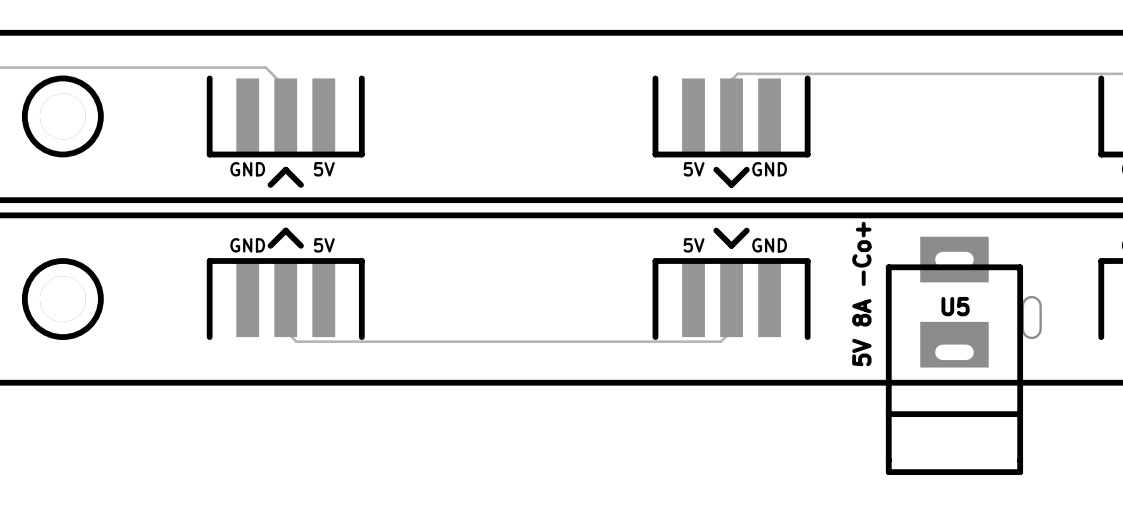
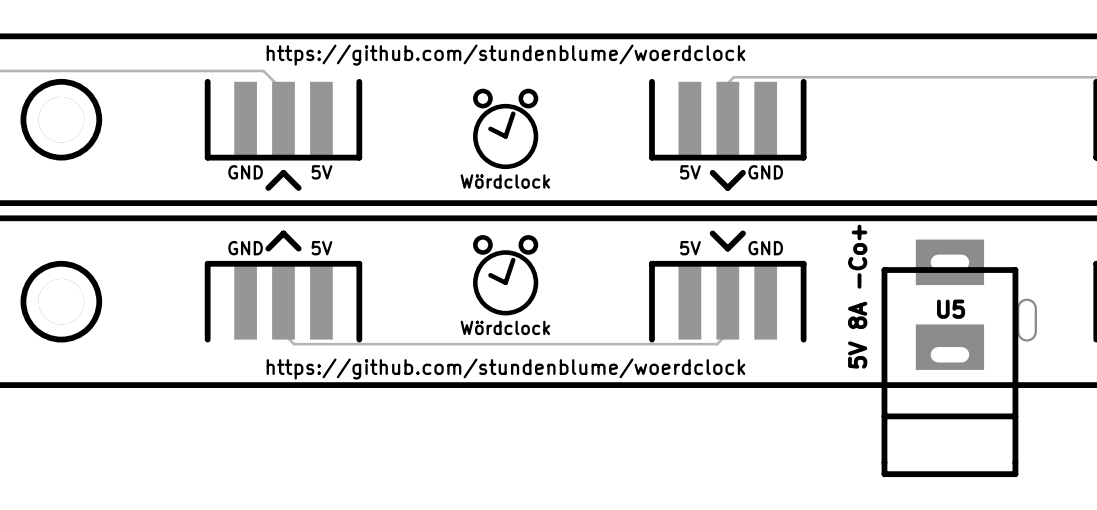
text: none -> https://github.com/stundenblume/woerdclock (505, 55)
Wördclock: none -> (505, 128)
Wördclock: none -> (505, 275)
text: none -> https://github.com/stundenblume/woerdclock (505, 369)

